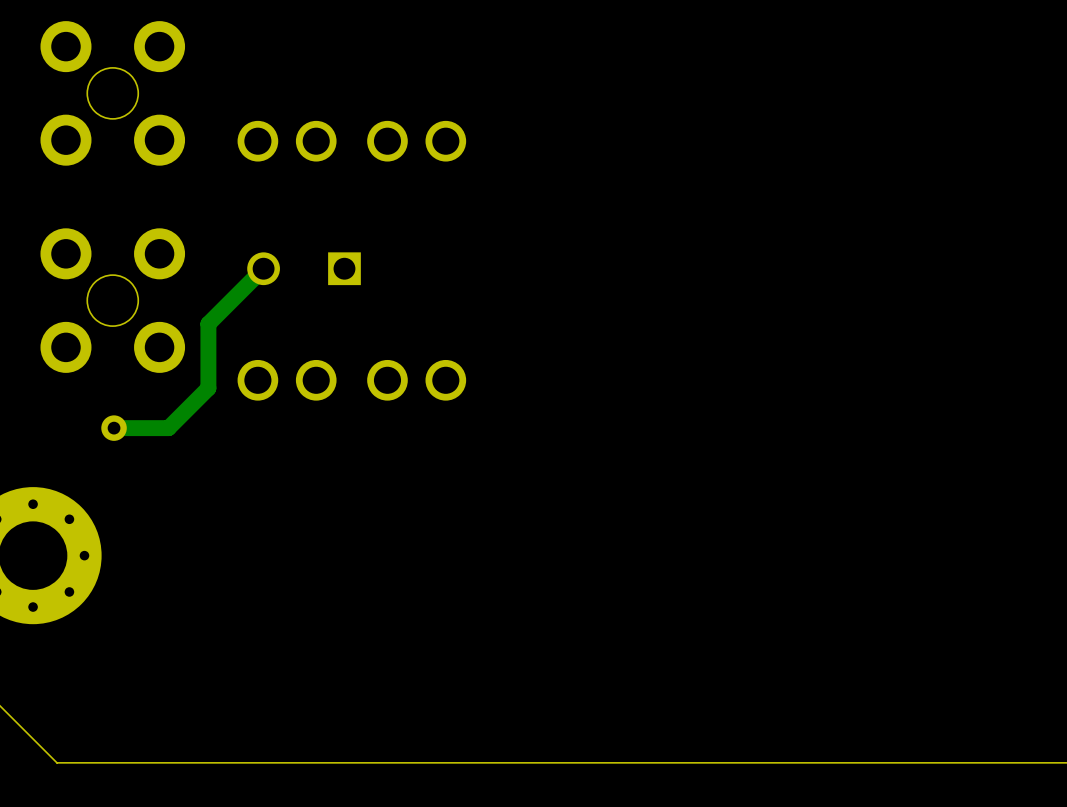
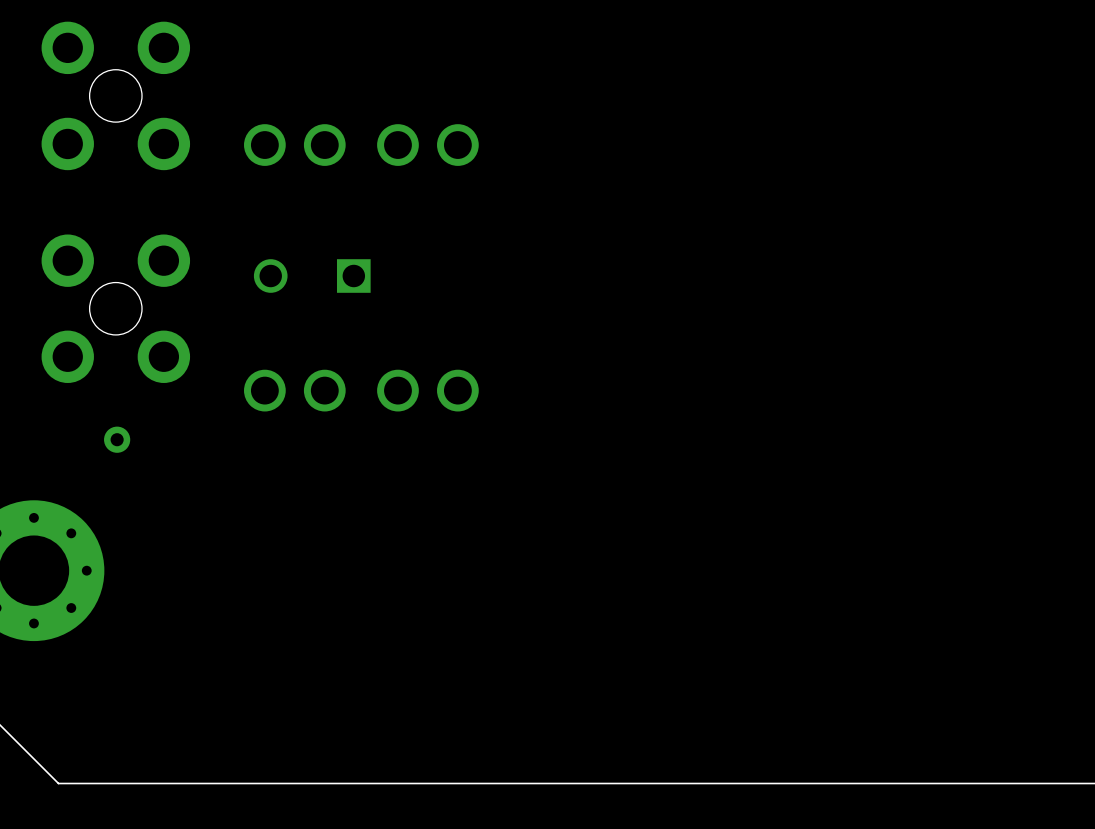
track: (263, 268) (208, 323) (208, 388) (168, 428) (114, 428) -> none

